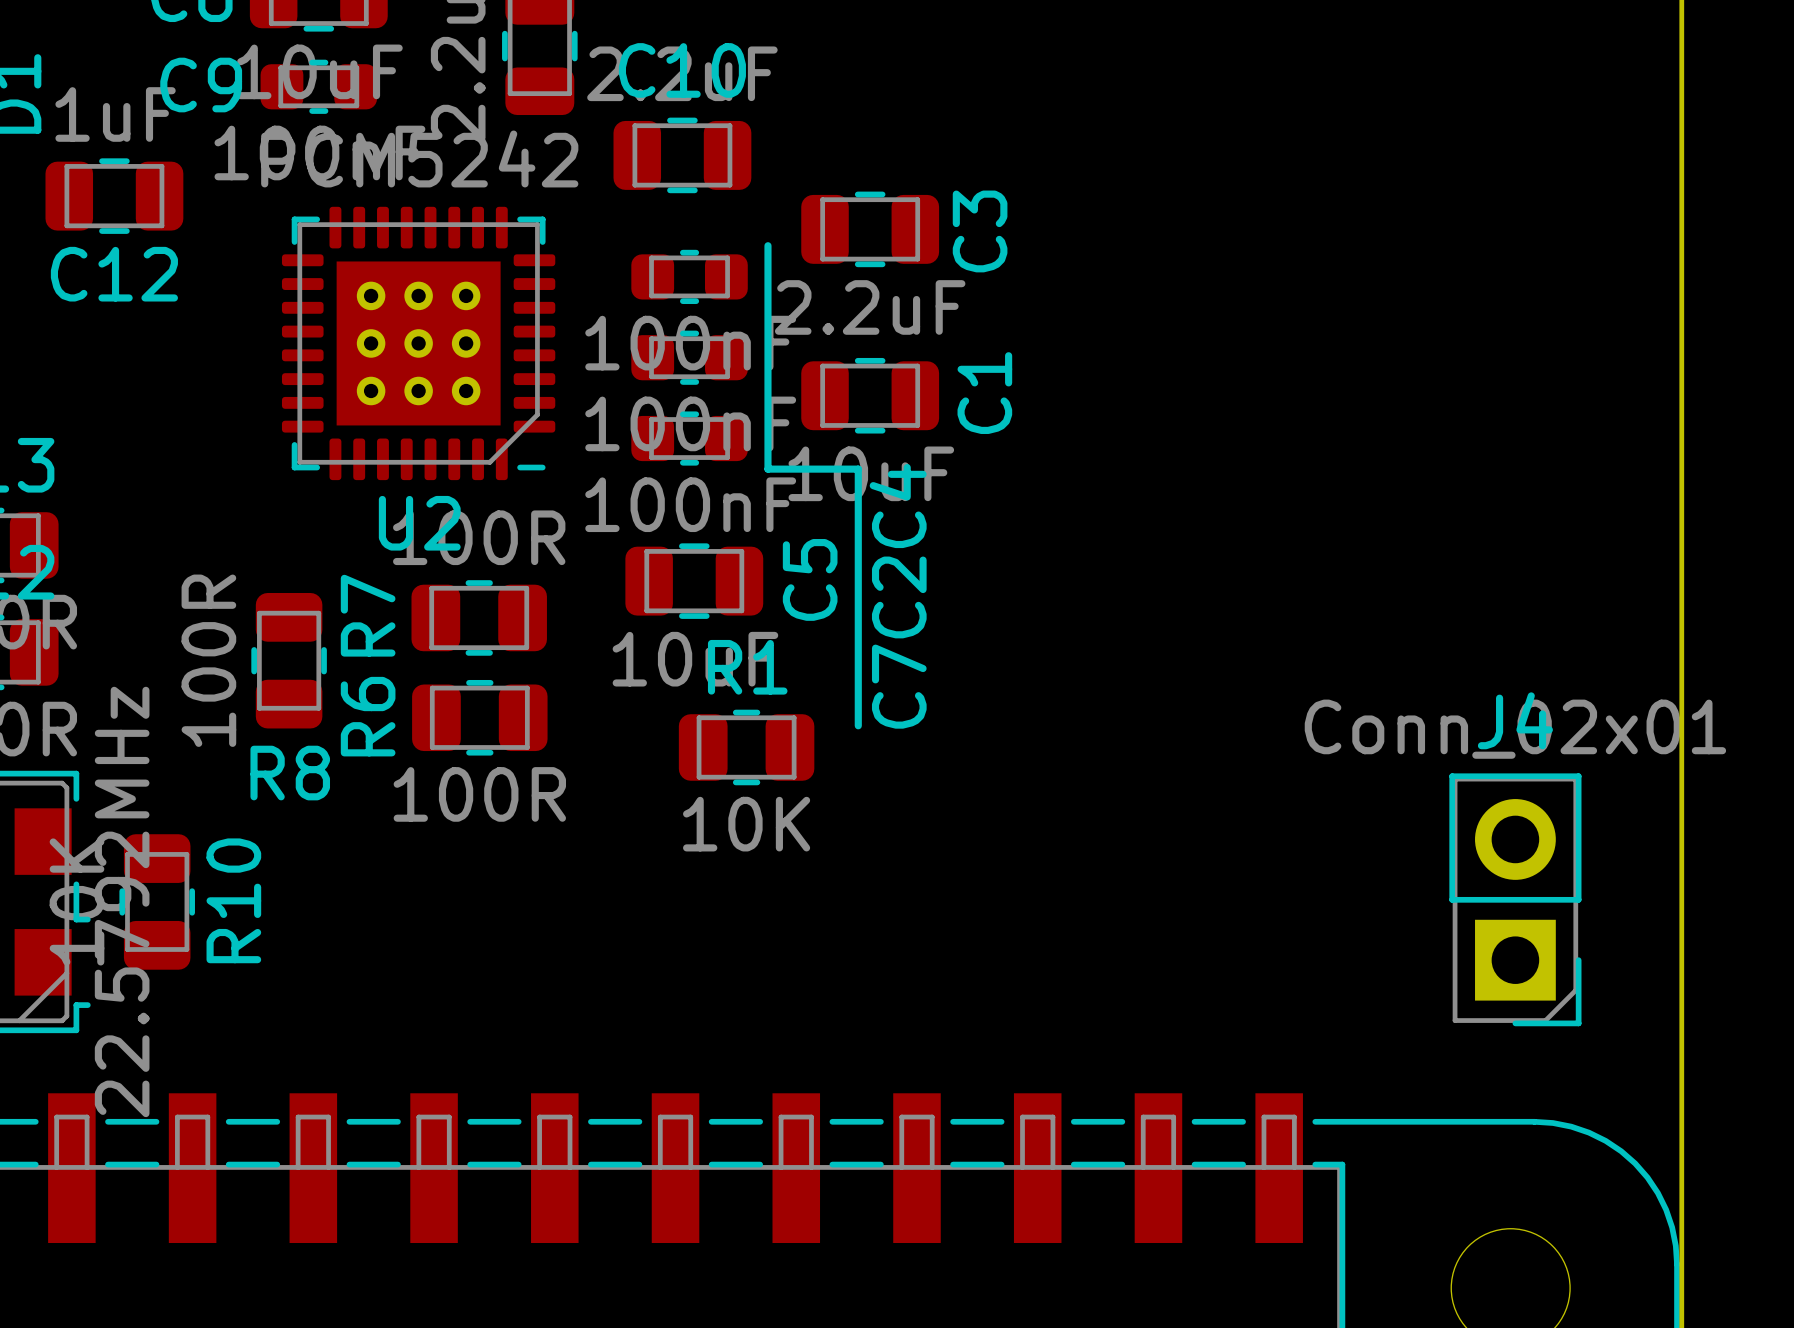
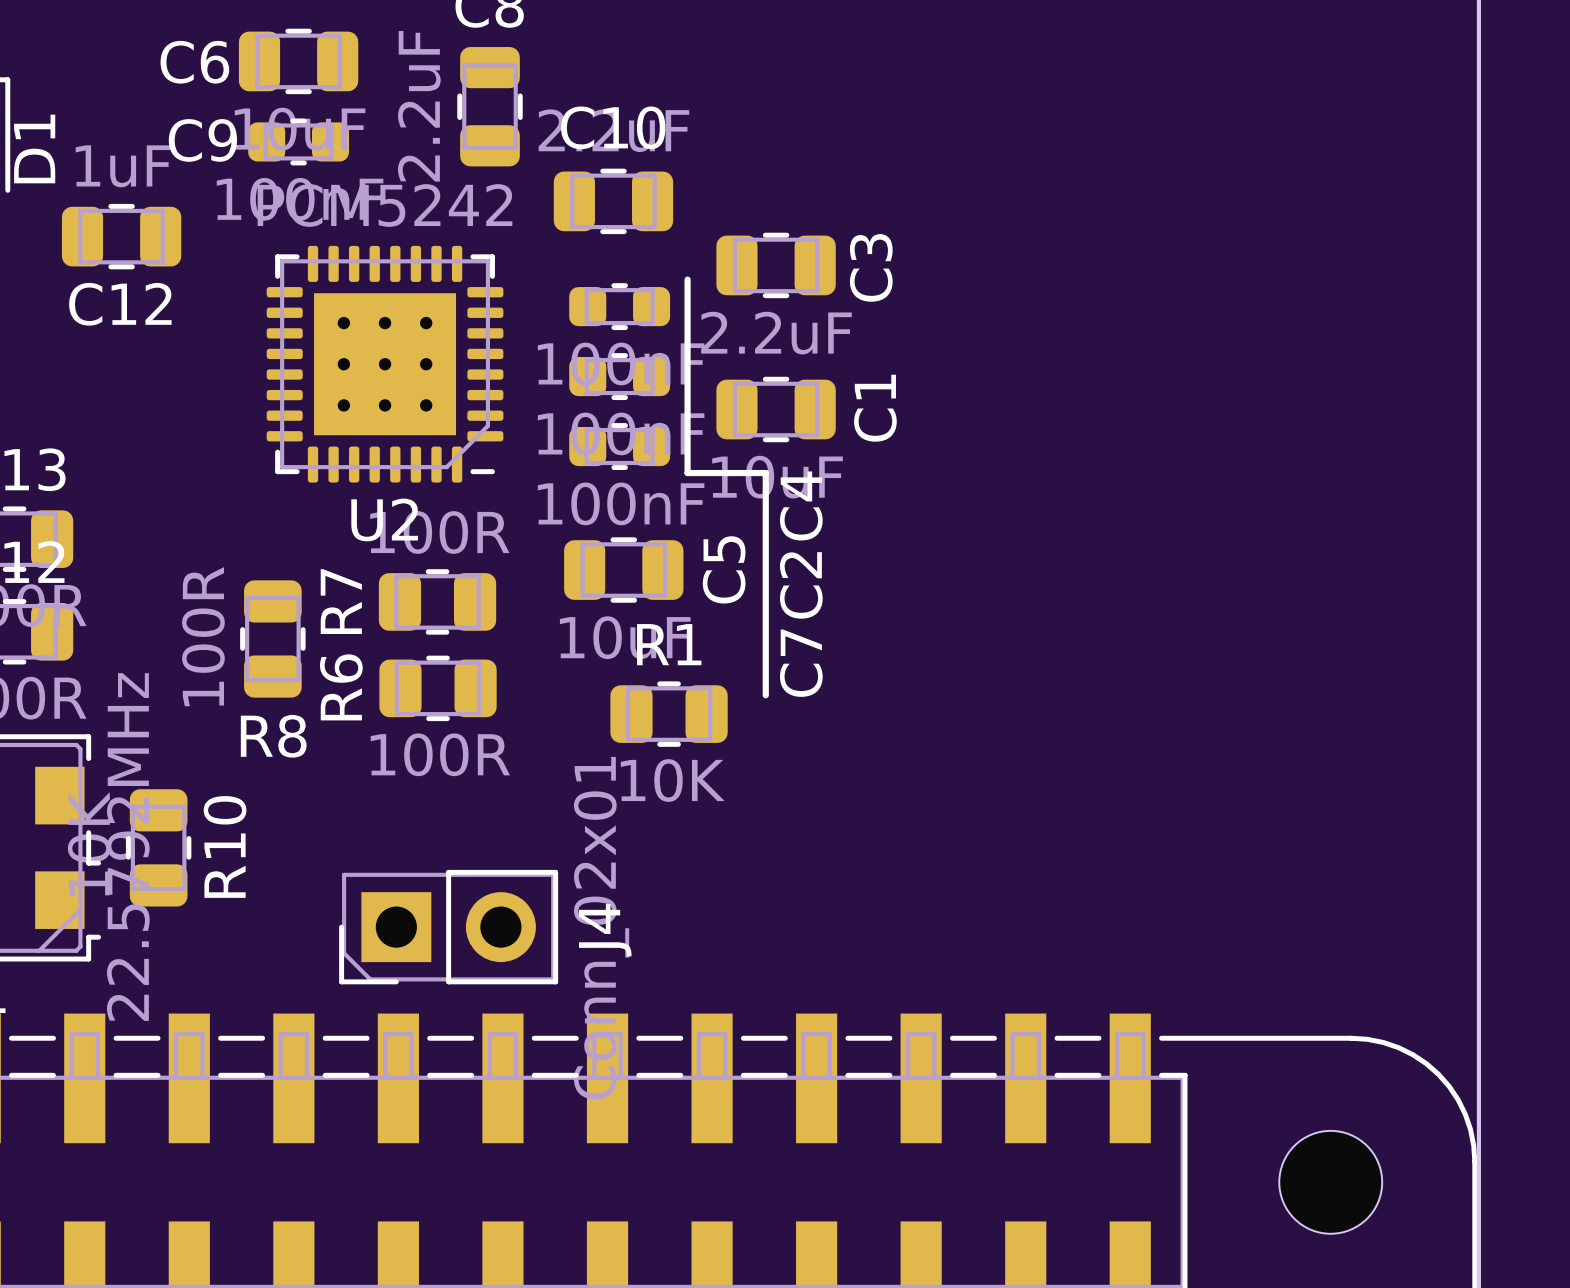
J4 rotation: 0° (1515, 899) -> 90° clockwise (448, 927)
J4 position: (1515, 899) -> (448, 927)

